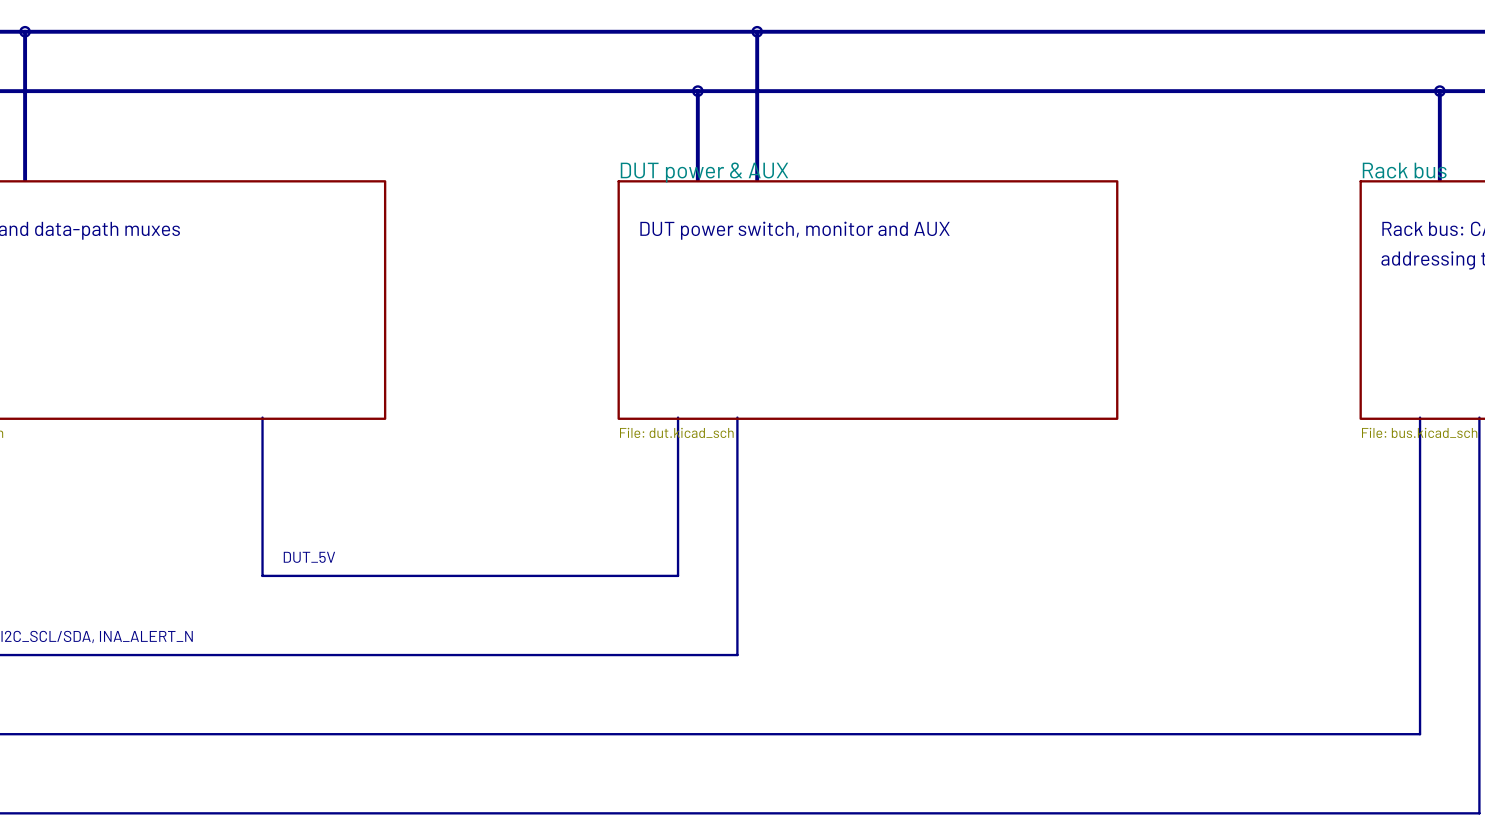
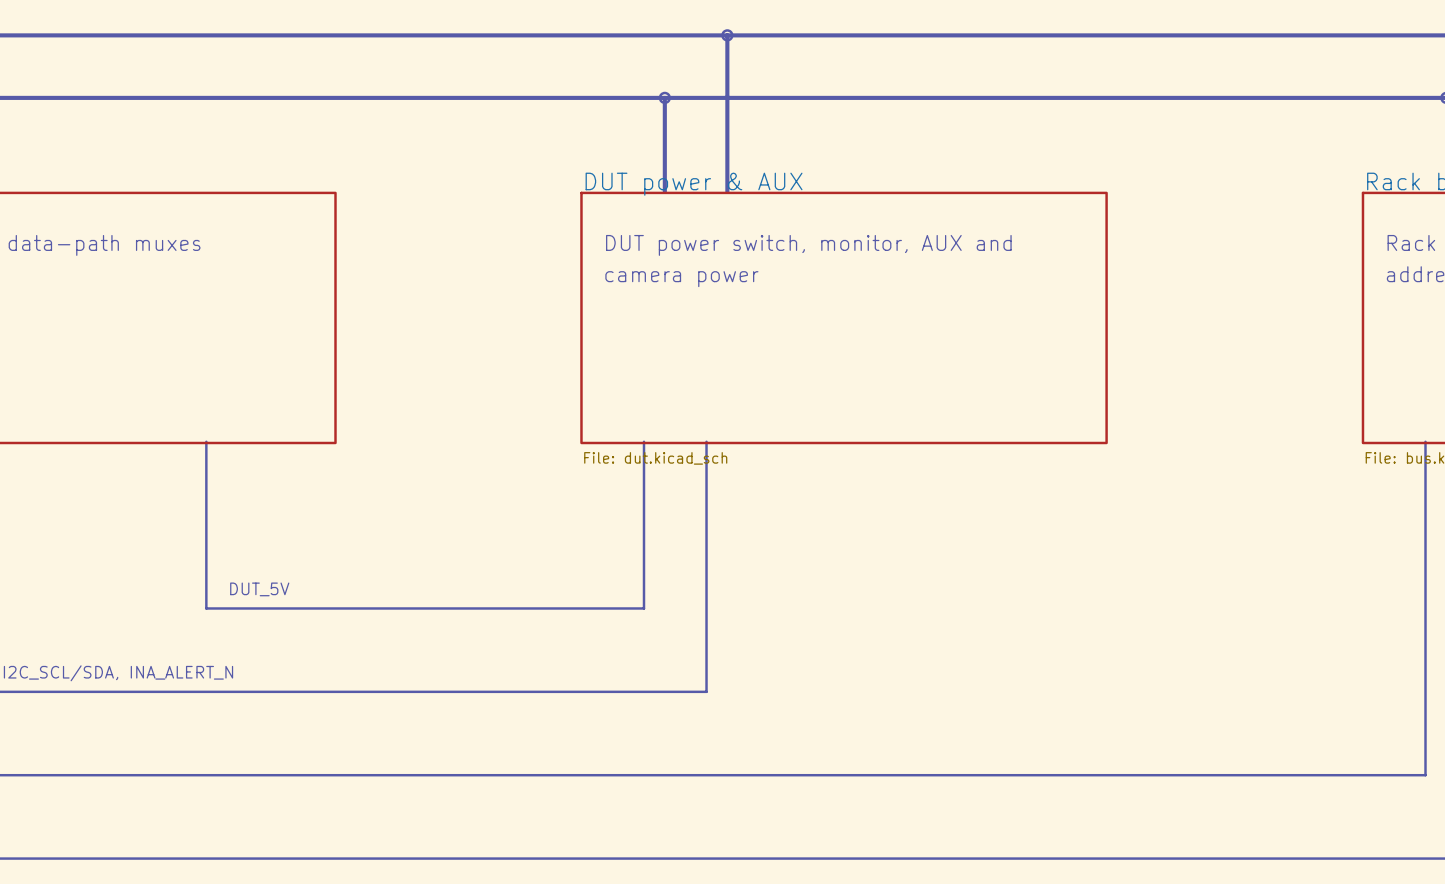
text: DUT power switch, monitor and AUX (795, 230) -> DUT power switch, monitor, AUX and (808, 245)
text: none -> camera power (681, 279)

